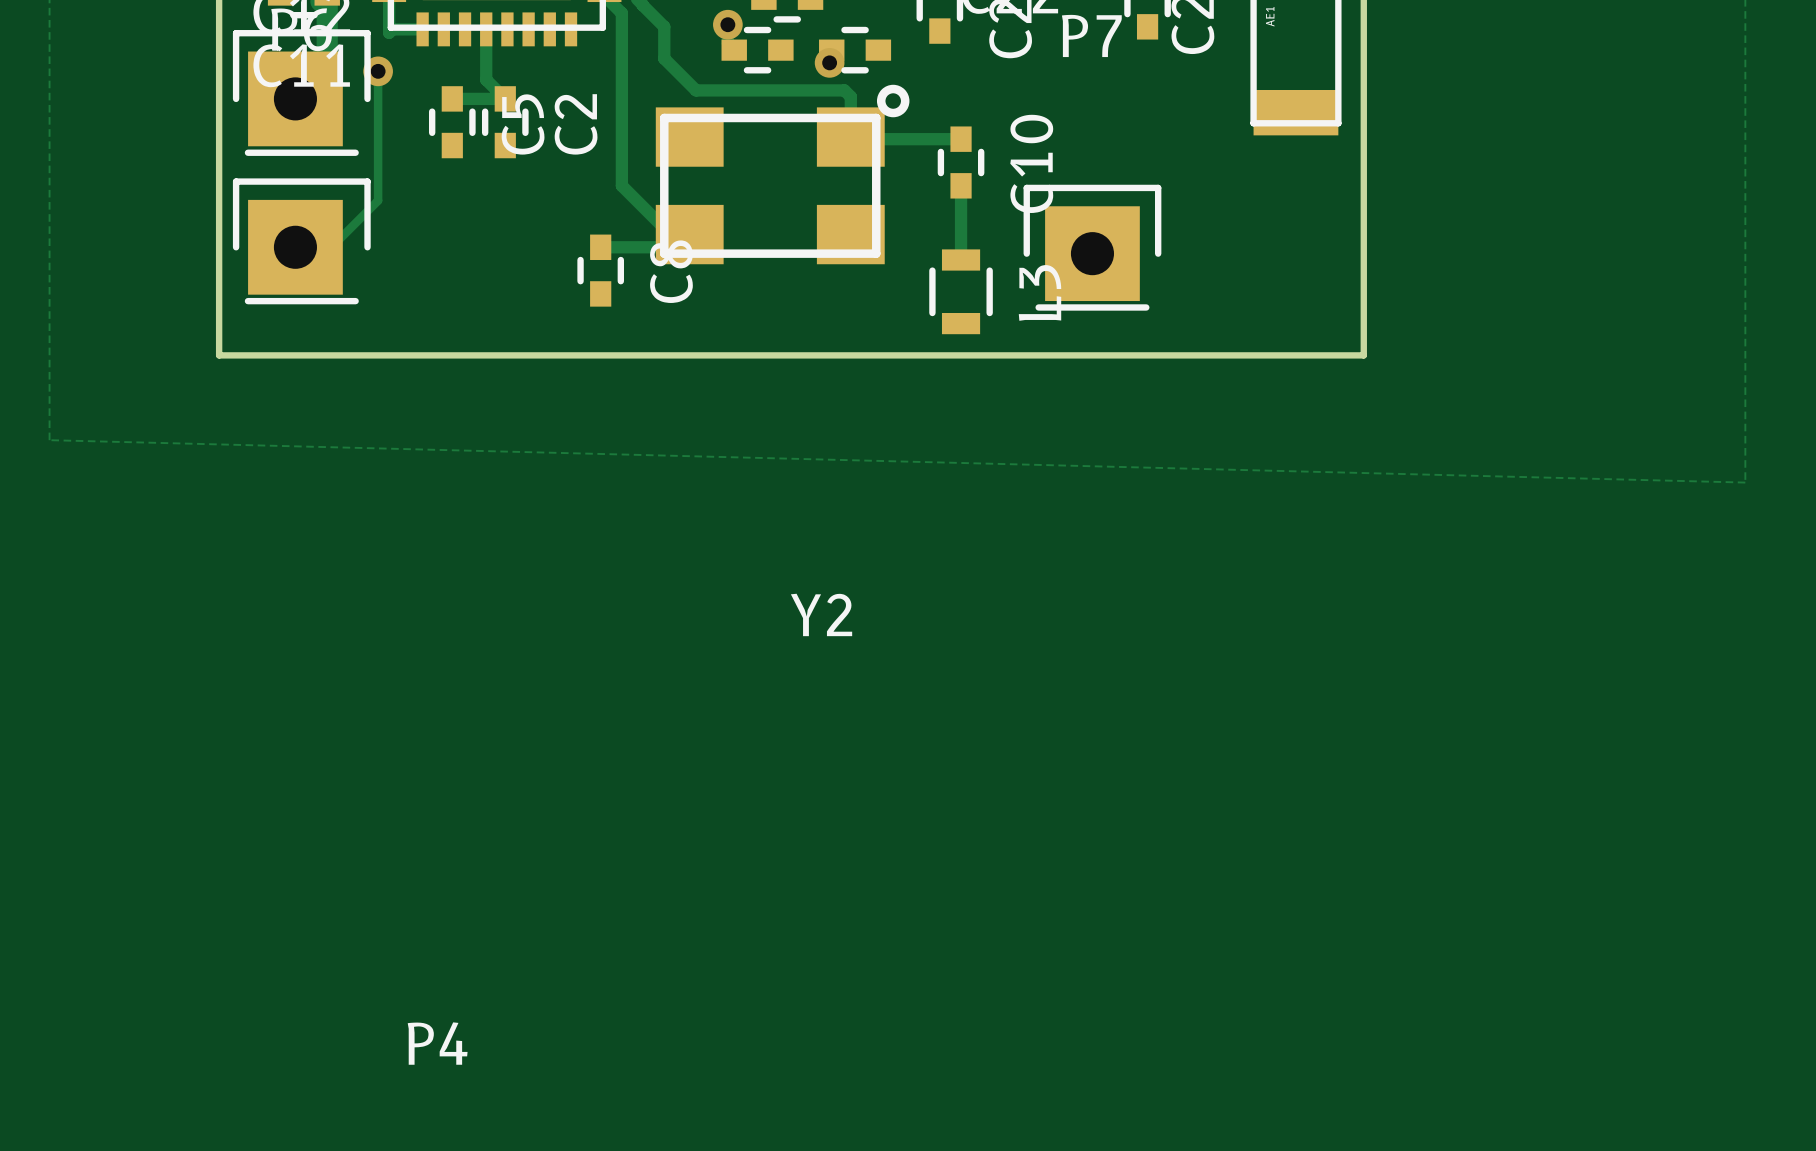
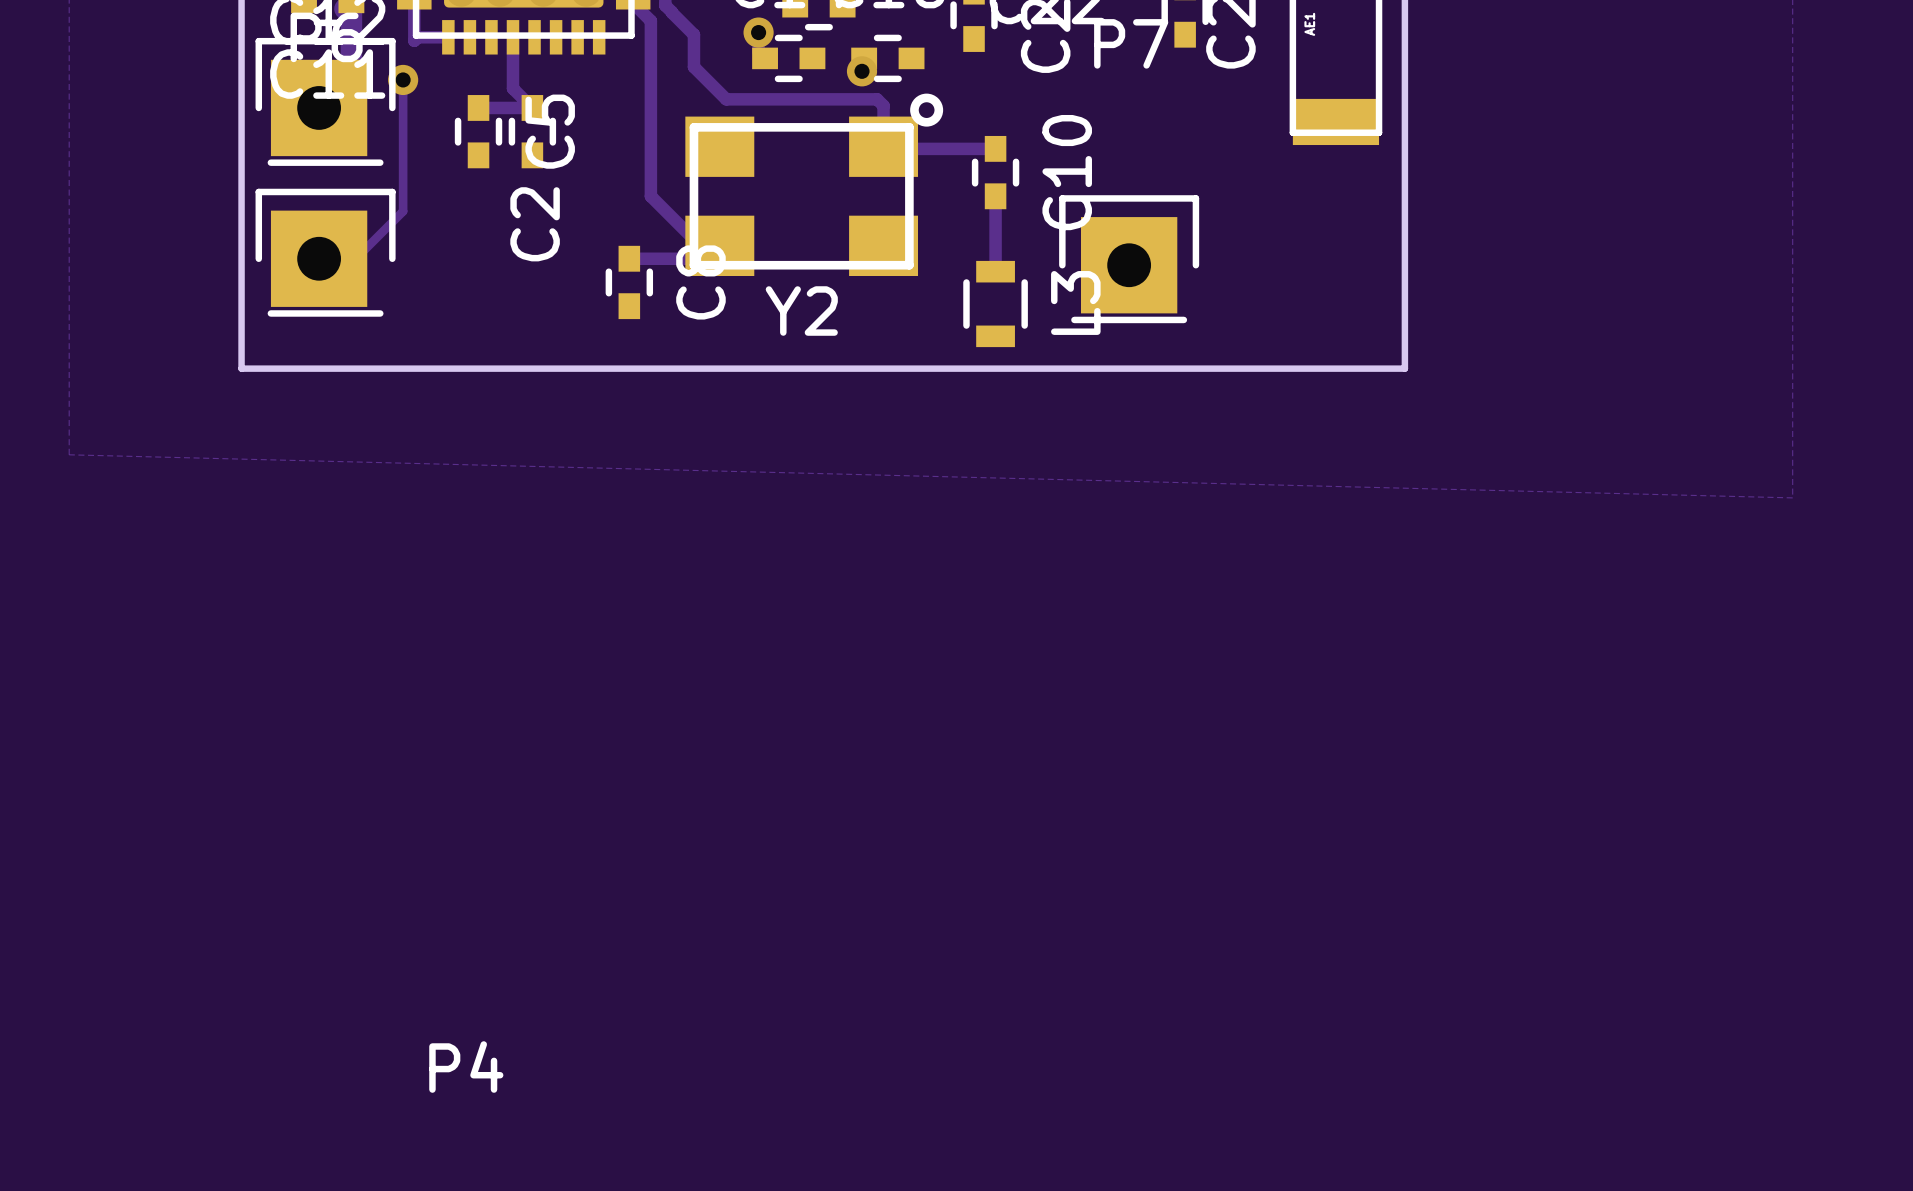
C2 name position: C2 (576, 124) -> C2 (535, 224)
Y2 name position: Y2 (821, 614) -> Y2 (801, 311)

